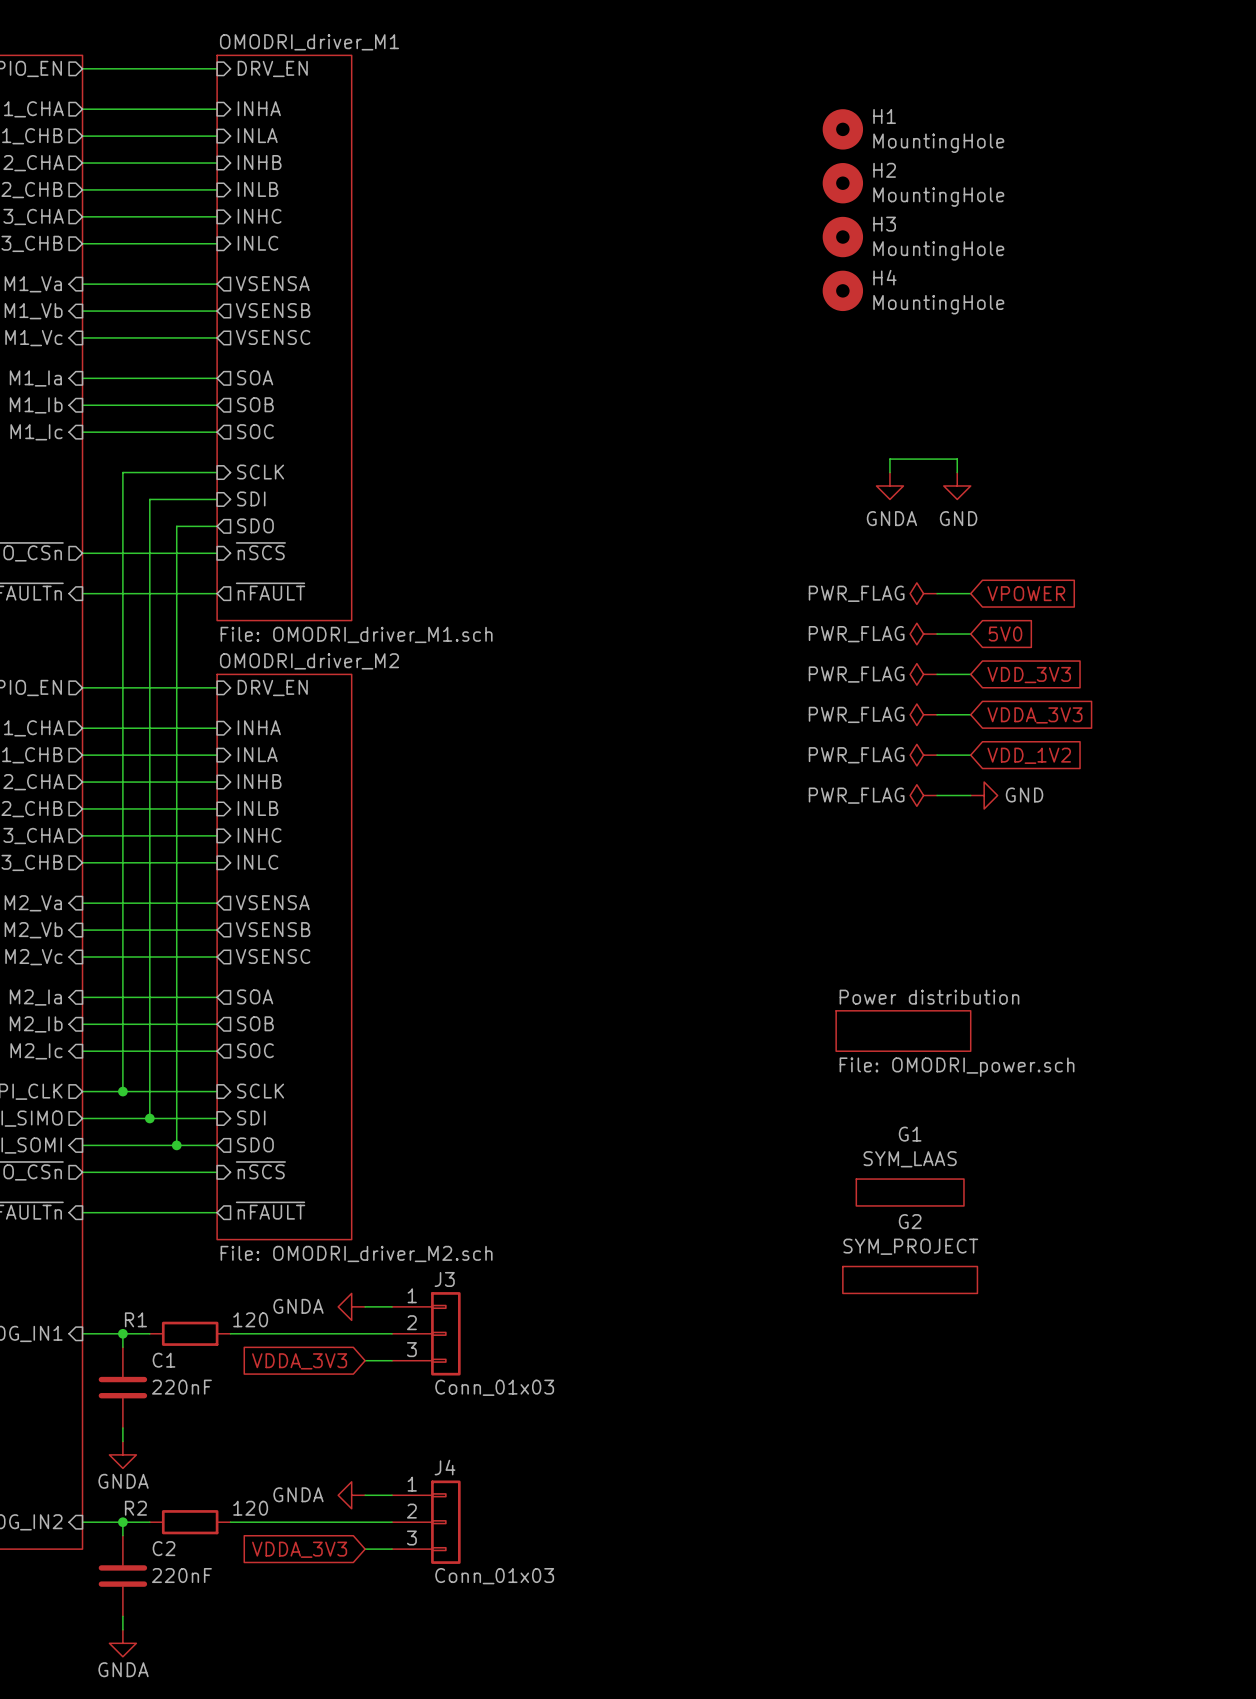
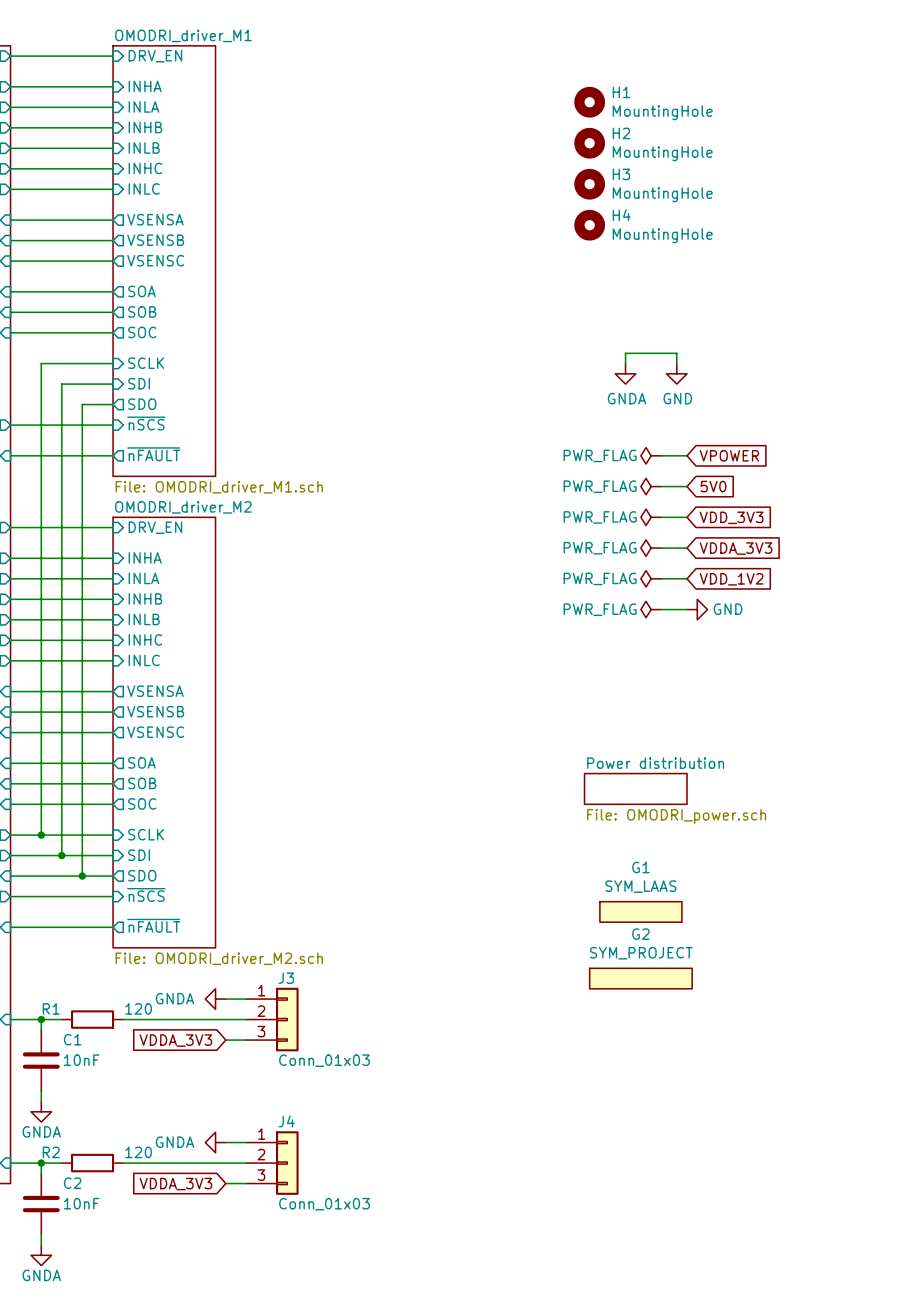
C1 value: 220nF (181, 1387) -> 10nF (81, 1060)
C2 value: 220nF (181, 1575) -> 10nF (81, 1203)

